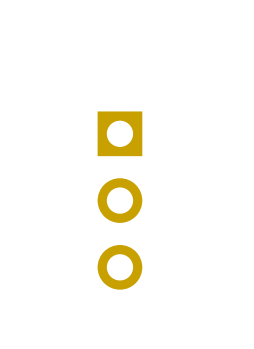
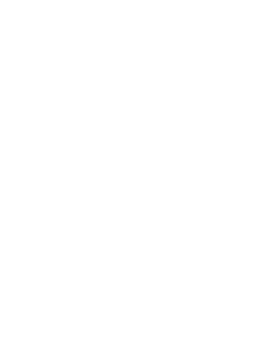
part: (119, 200) -> none

